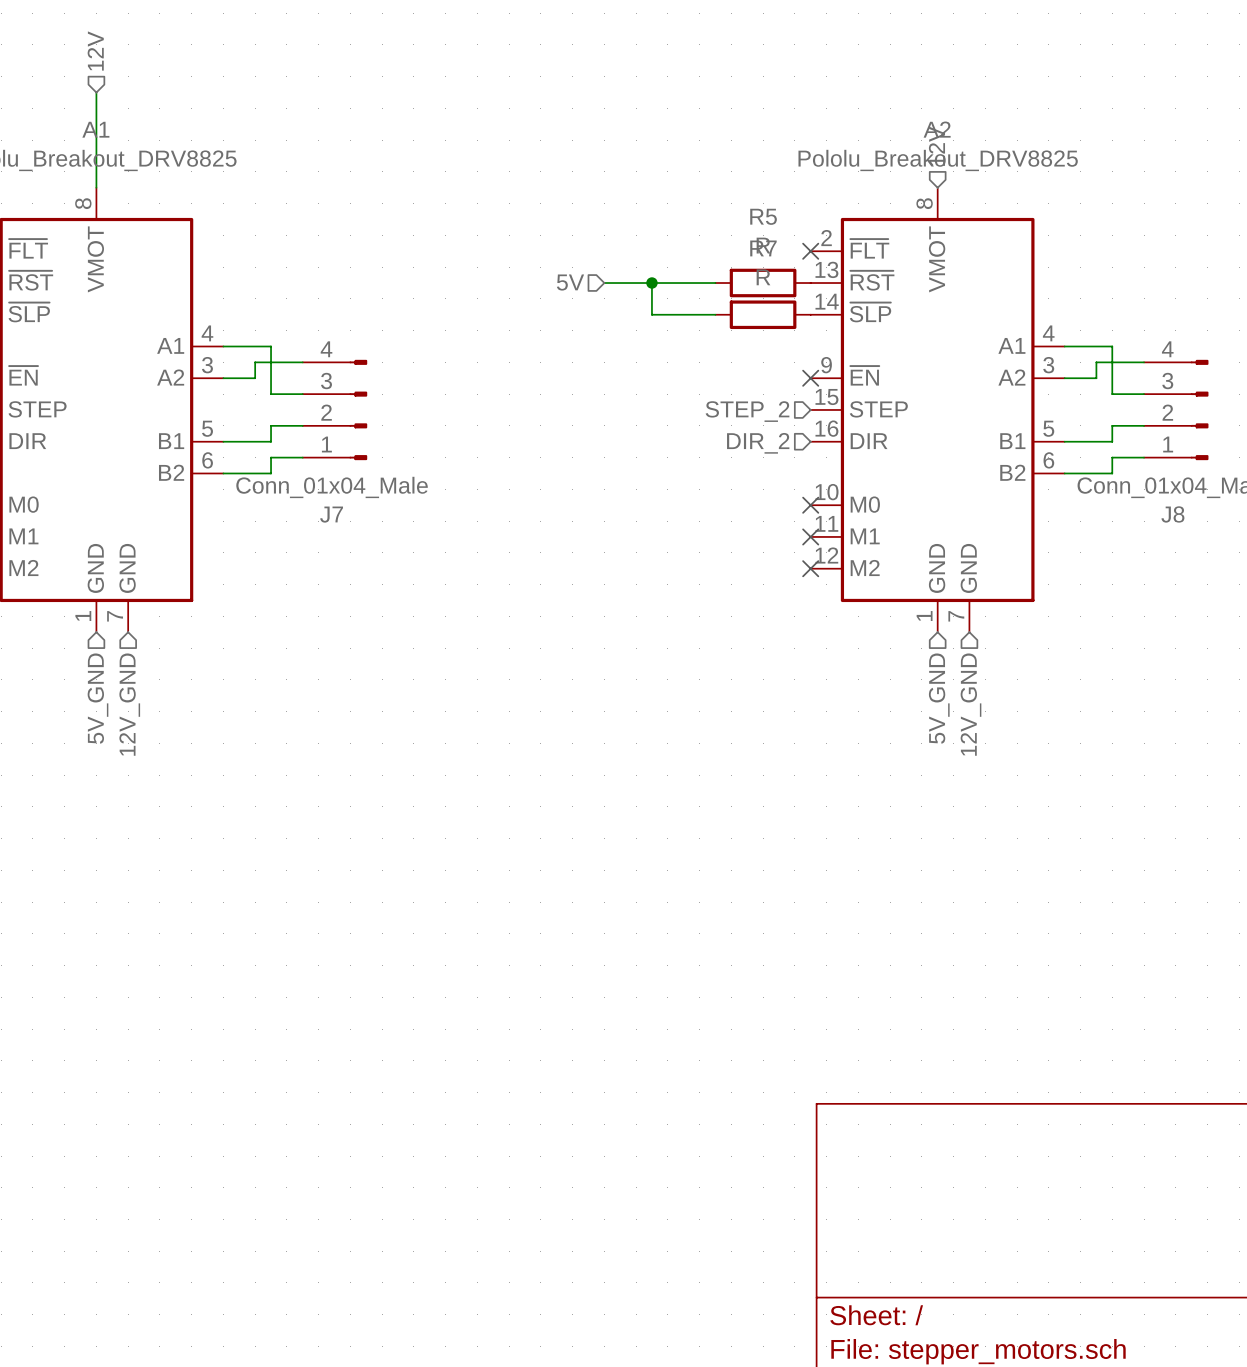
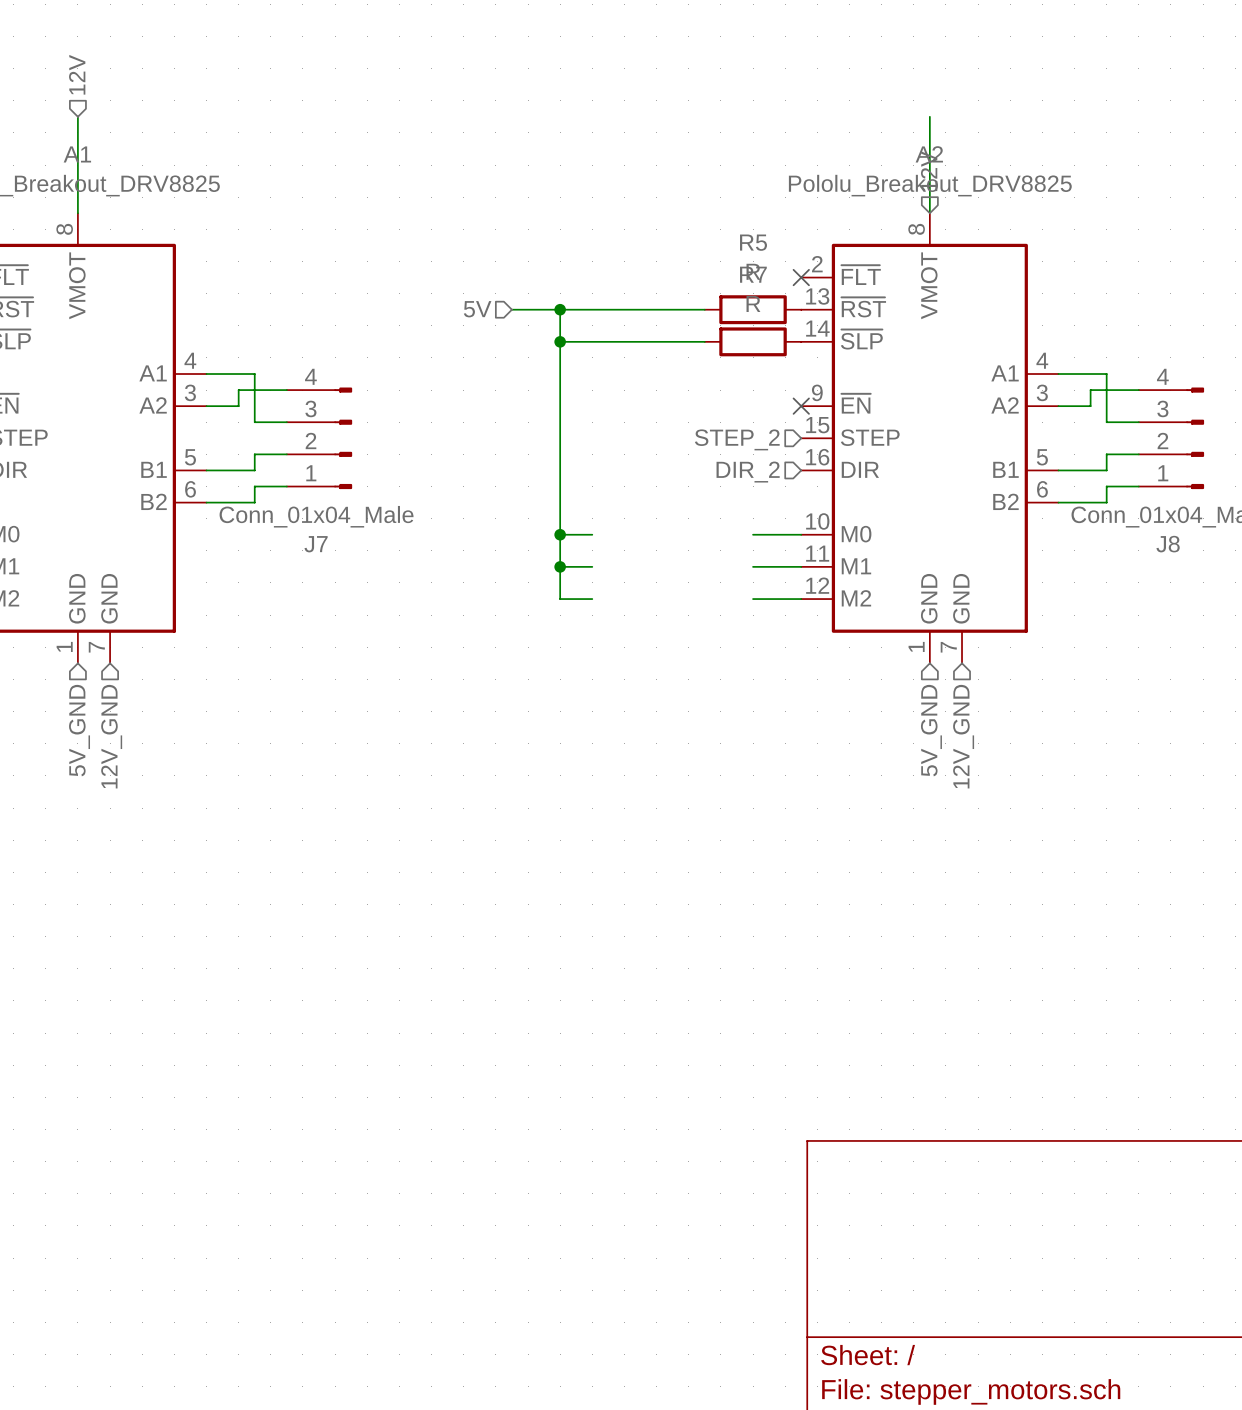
wire: none -> (929, 116) (929, 213)
hierarchical label position: 5V (570, 282) -> 5V (477, 309)
wire: none -> (511, 309) (592, 309)
wire: none -> (560, 309) (560, 599) (592, 599)
junction: none -> (560, 309)
wire: (651, 283) (651, 314) -> (560, 341) (640, 341)
junction: (651, 283) -> none
junction: none -> (560, 341)
wire: none -> (560, 534) (592, 534)
junction: none -> (560, 534)
wire: none -> (753, 534) (801, 534)
no-connect mark: (810, 505) -> none
wire: none -> (560, 566) (592, 566)
junction: none -> (560, 566)
wire: none -> (753, 566) (801, 566)
no-connect mark: (810, 536) -> none
wire: none -> (753, 599) (801, 599)
no-connect mark: (810, 568) -> none

